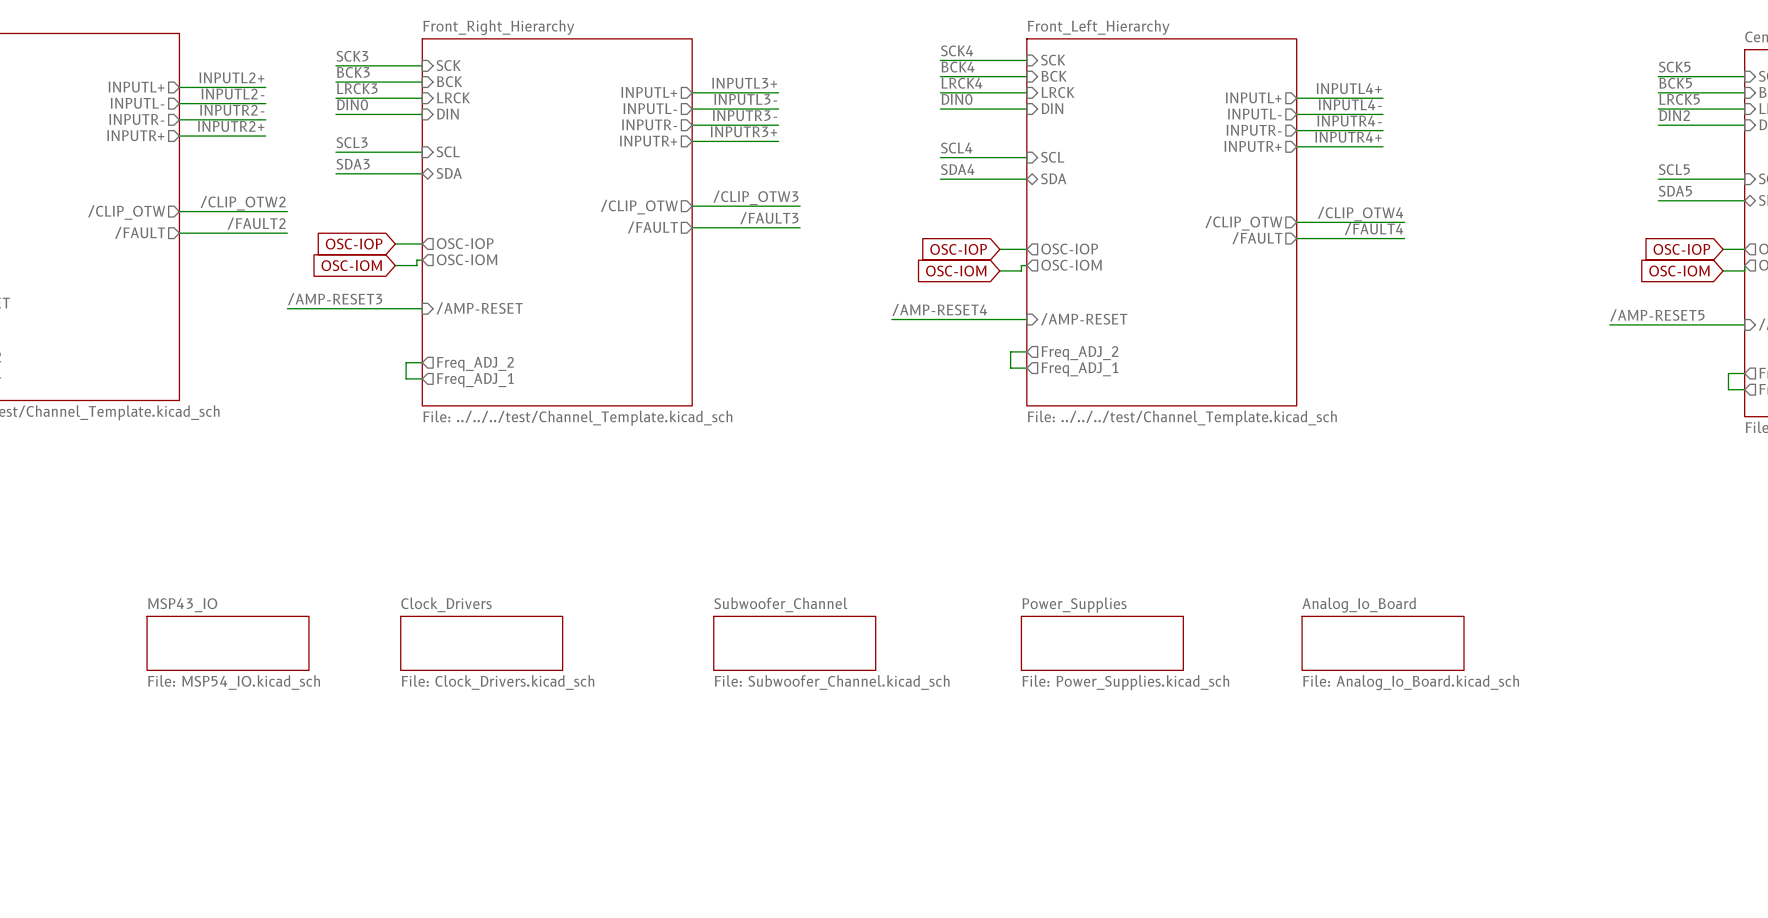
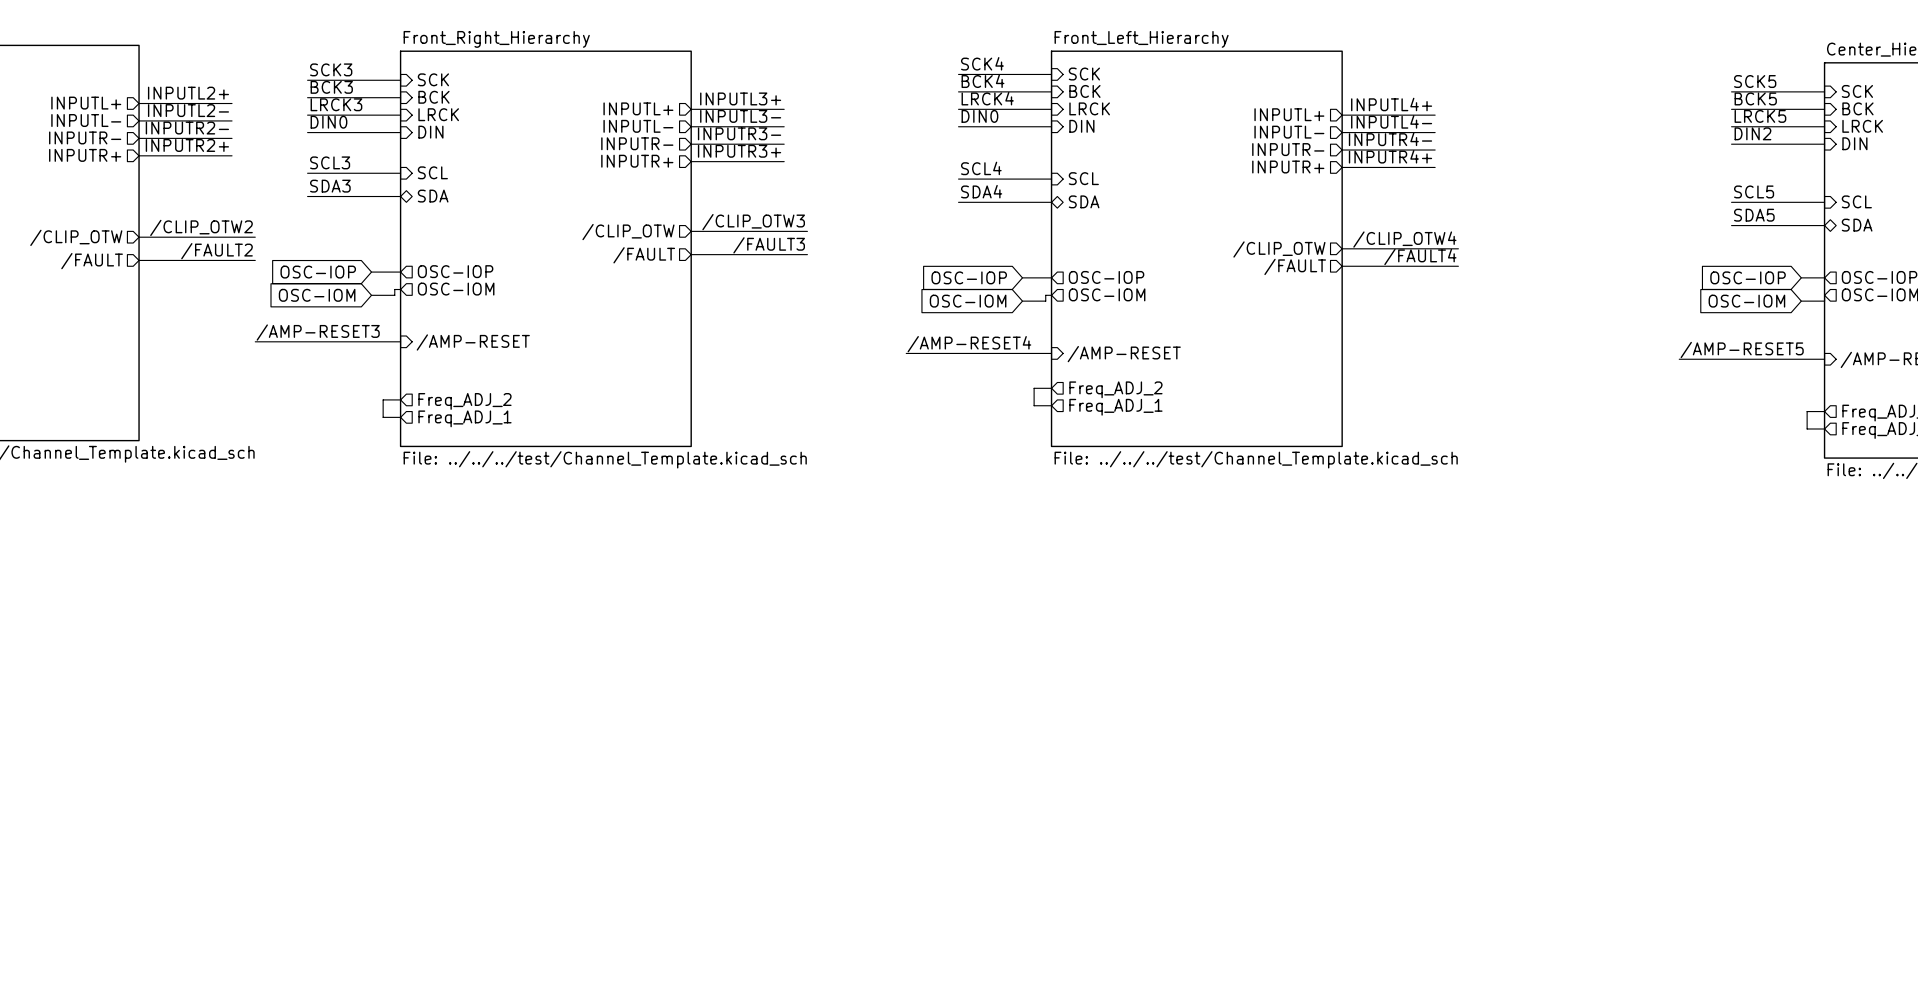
sheet MSP43_IO: File: MSP54_IO.kicad_sch (228, 643) -> none
sheet Clock_Drivers: File: Clock_Drivers.kicad_sch (481, 643) -> none
sheet Subwoofer_Channel: File: Subwoofer_Channel.kicad_sch (794, 643) -> none
sheet Power_Supplies: File: Power_Supplies.kicad_sch (1102, 643) -> none
sheet Analog_Io_Board: File: Analog_Io_Board.kicad_sch (1383, 643) -> none

